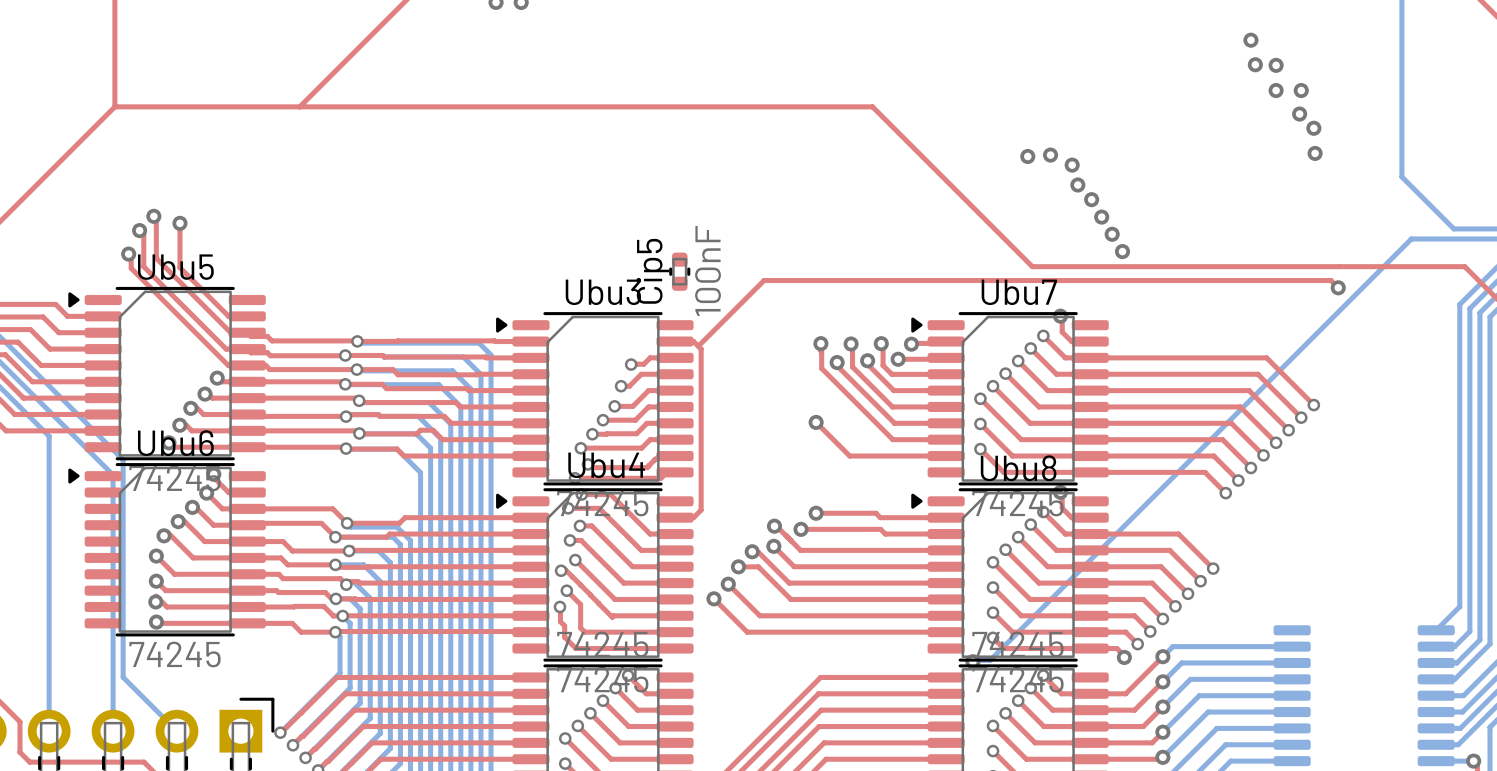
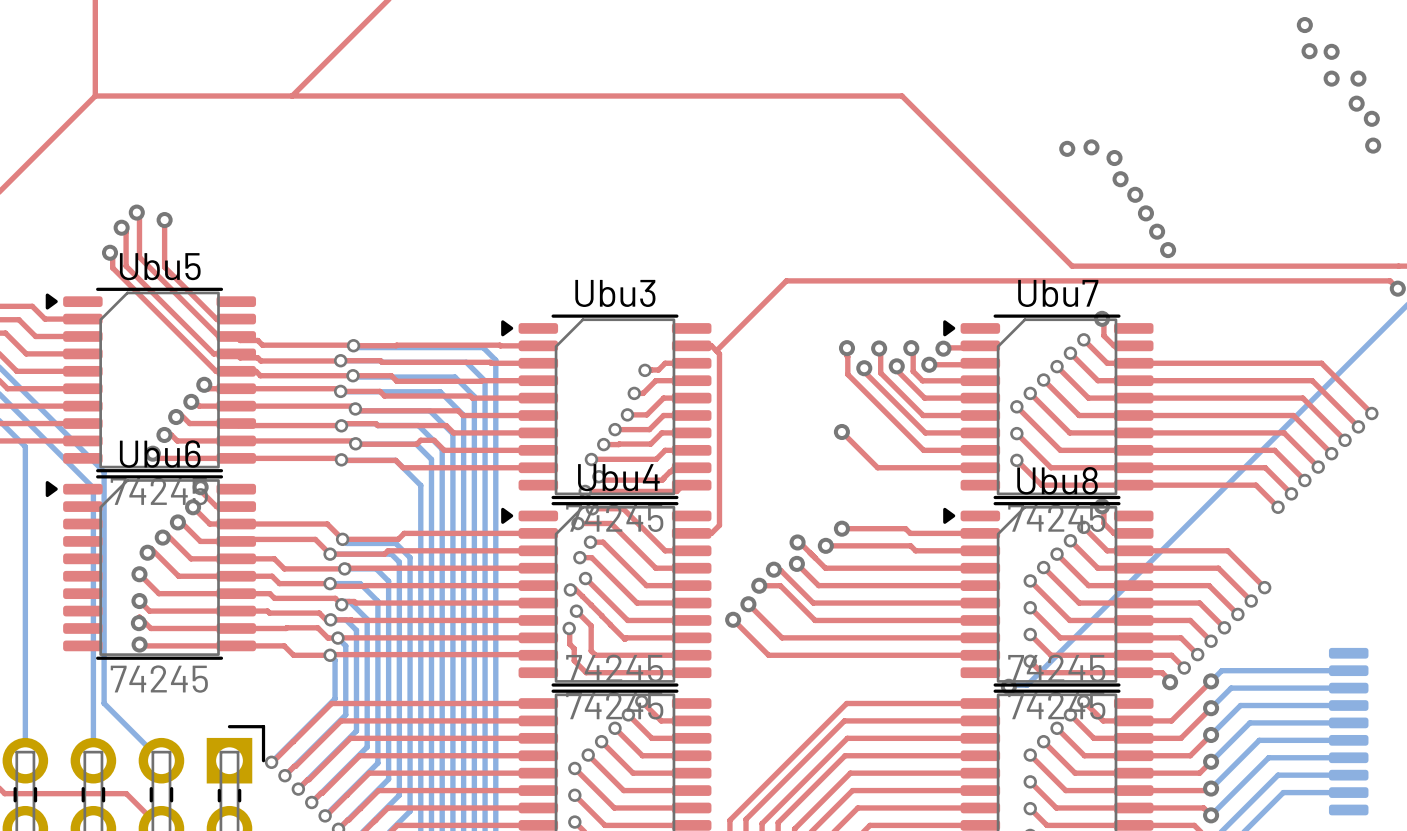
Cip5: 100nF (679, 271) -> none

